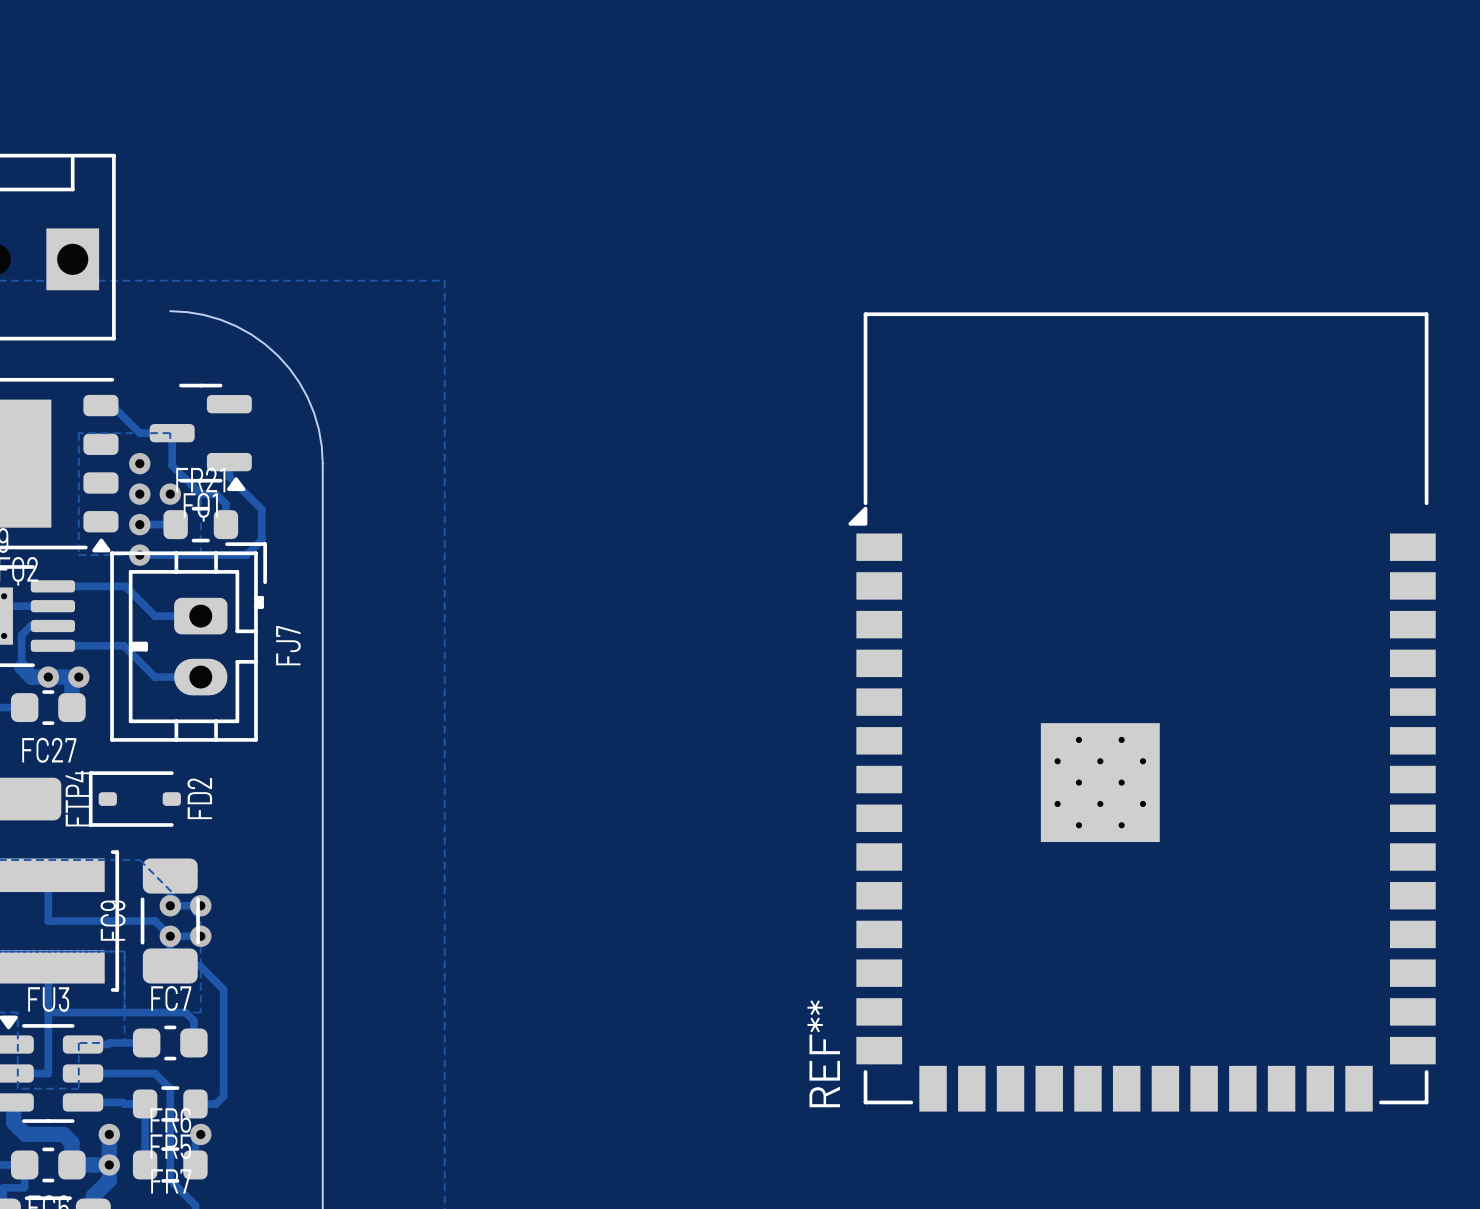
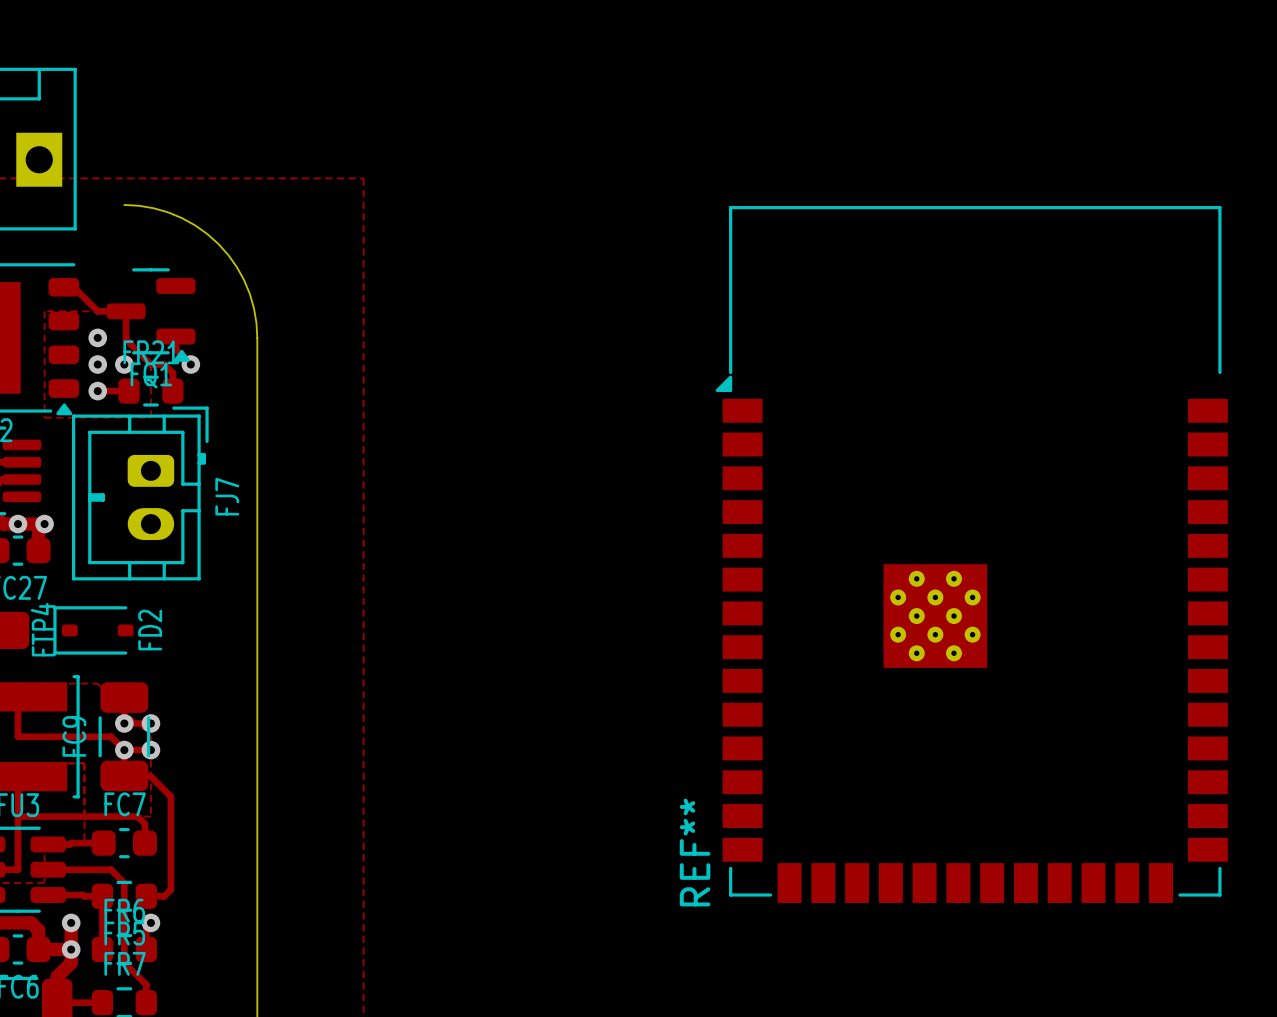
track: (246, 494) (261, 509) (261, 539) (246, 555) (139, 555) -> none
via position: (139, 555) -> (190, 364)
track: (52, 586) (125, 586) (155, 616) (200, 616) -> none
track: (52, 645) (123, 645) (155, 677) (200, 677) -> none

